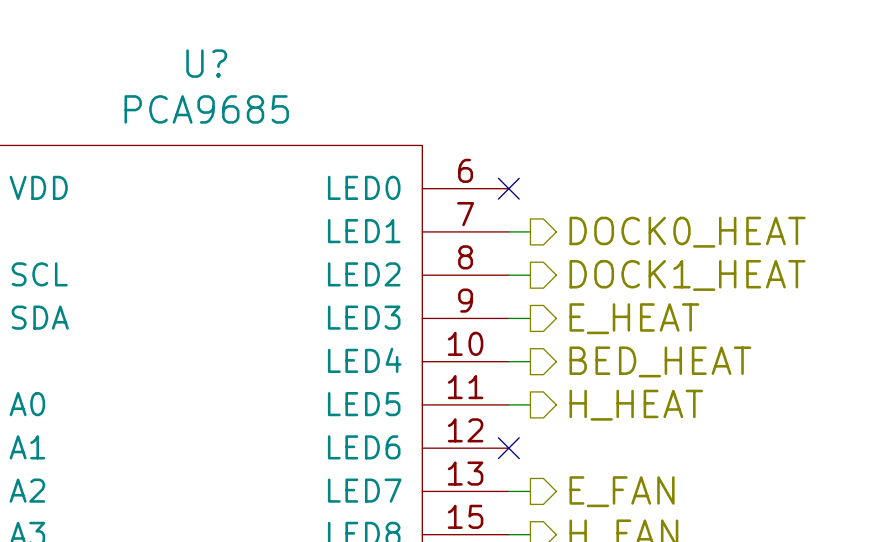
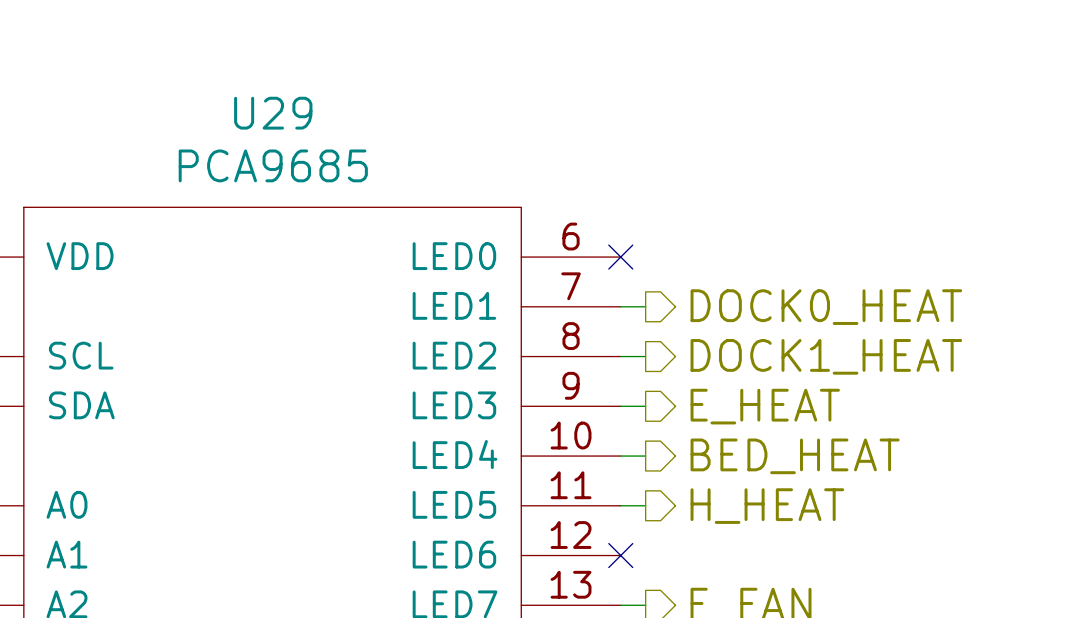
U? name: U? (206, 63) -> U29 (273, 113)

